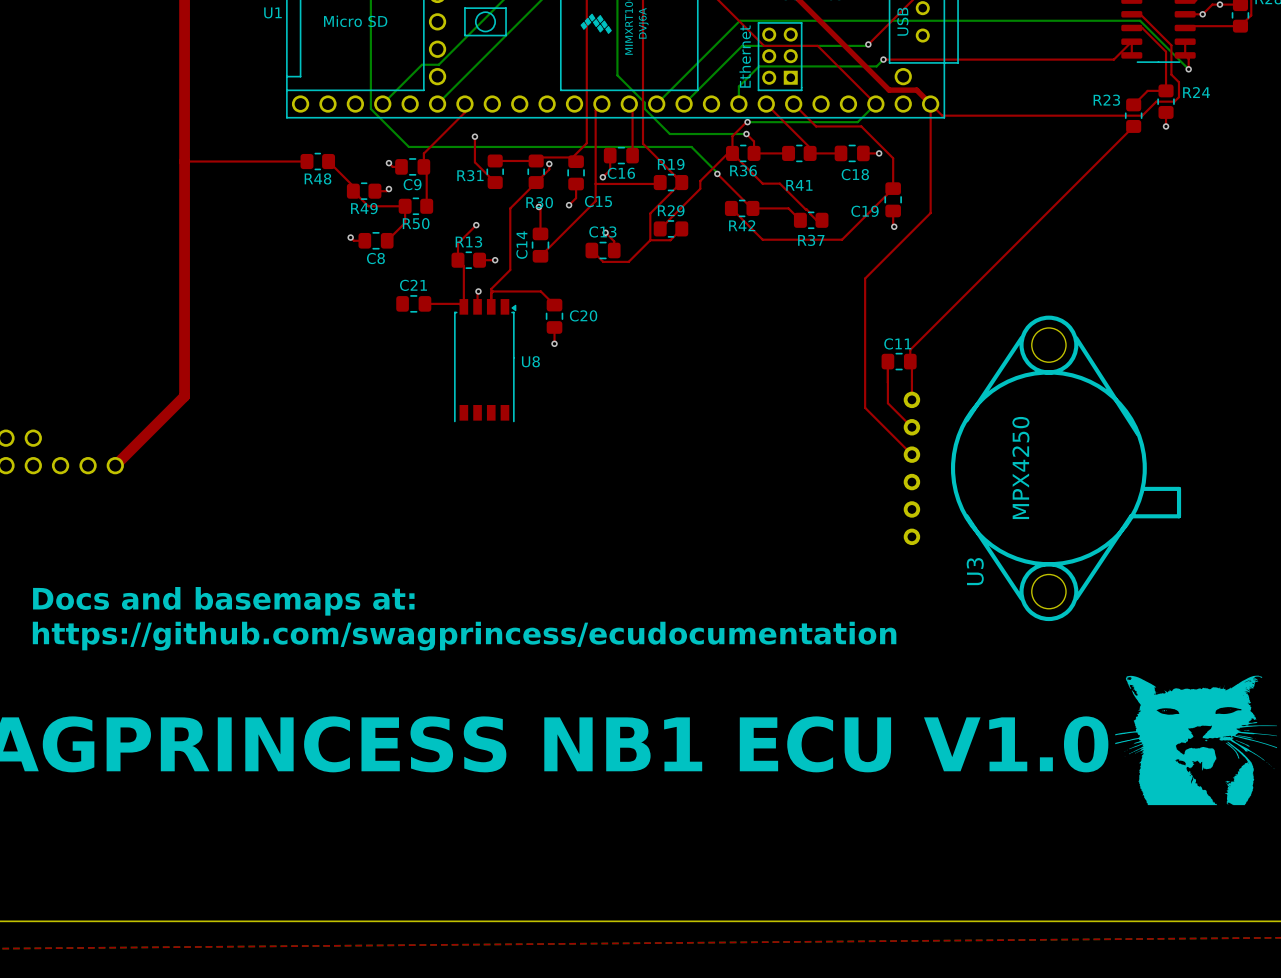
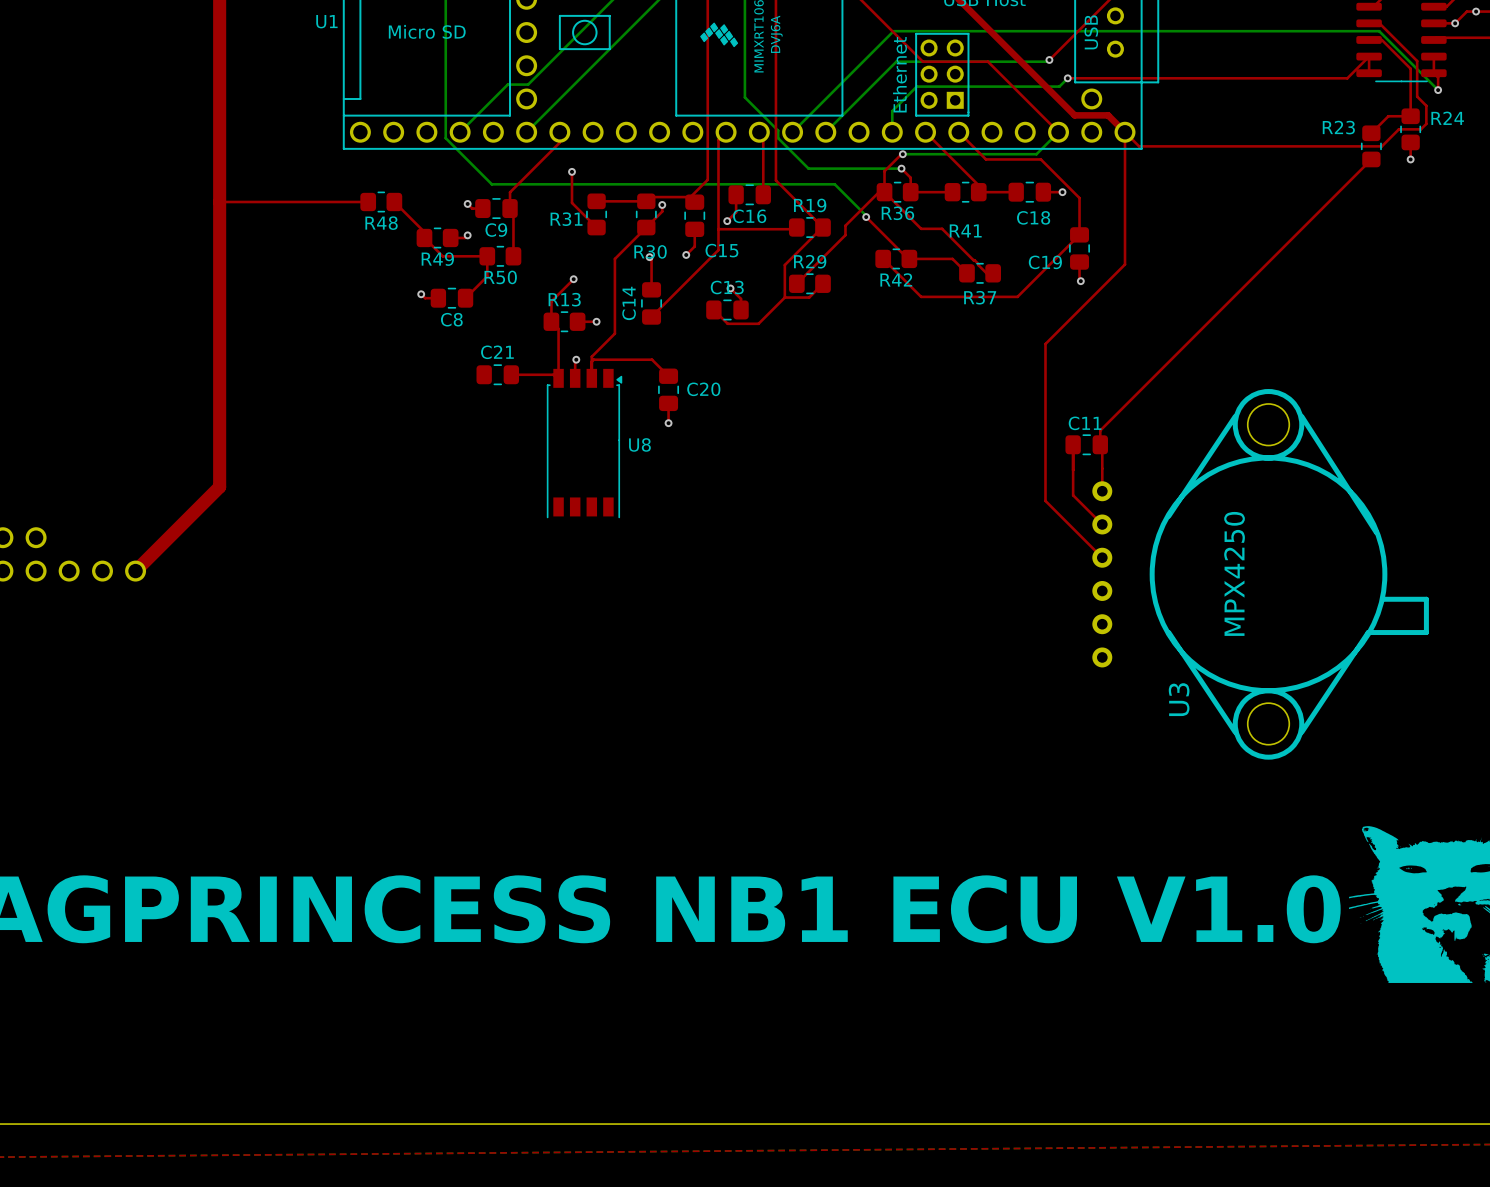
text: Docs and basemaps at: (223, 601) -> none
text: https://github.com/swagprincess/ecudocumentation (464, 636) -> none

